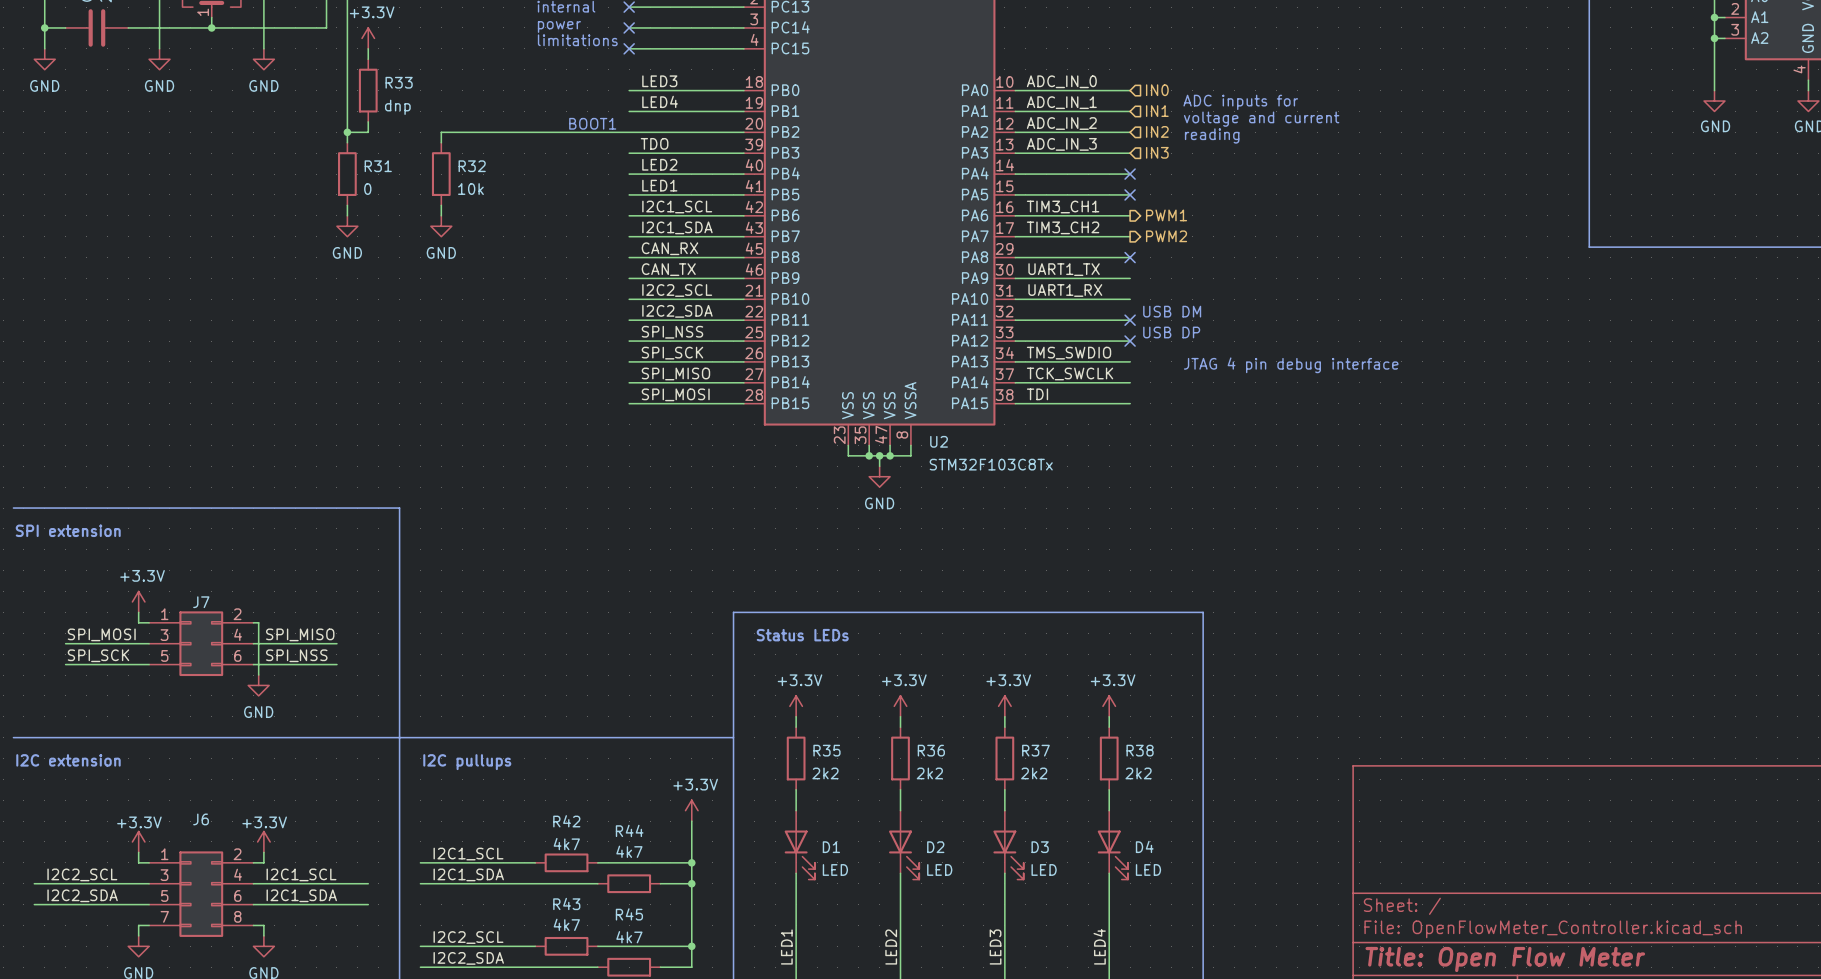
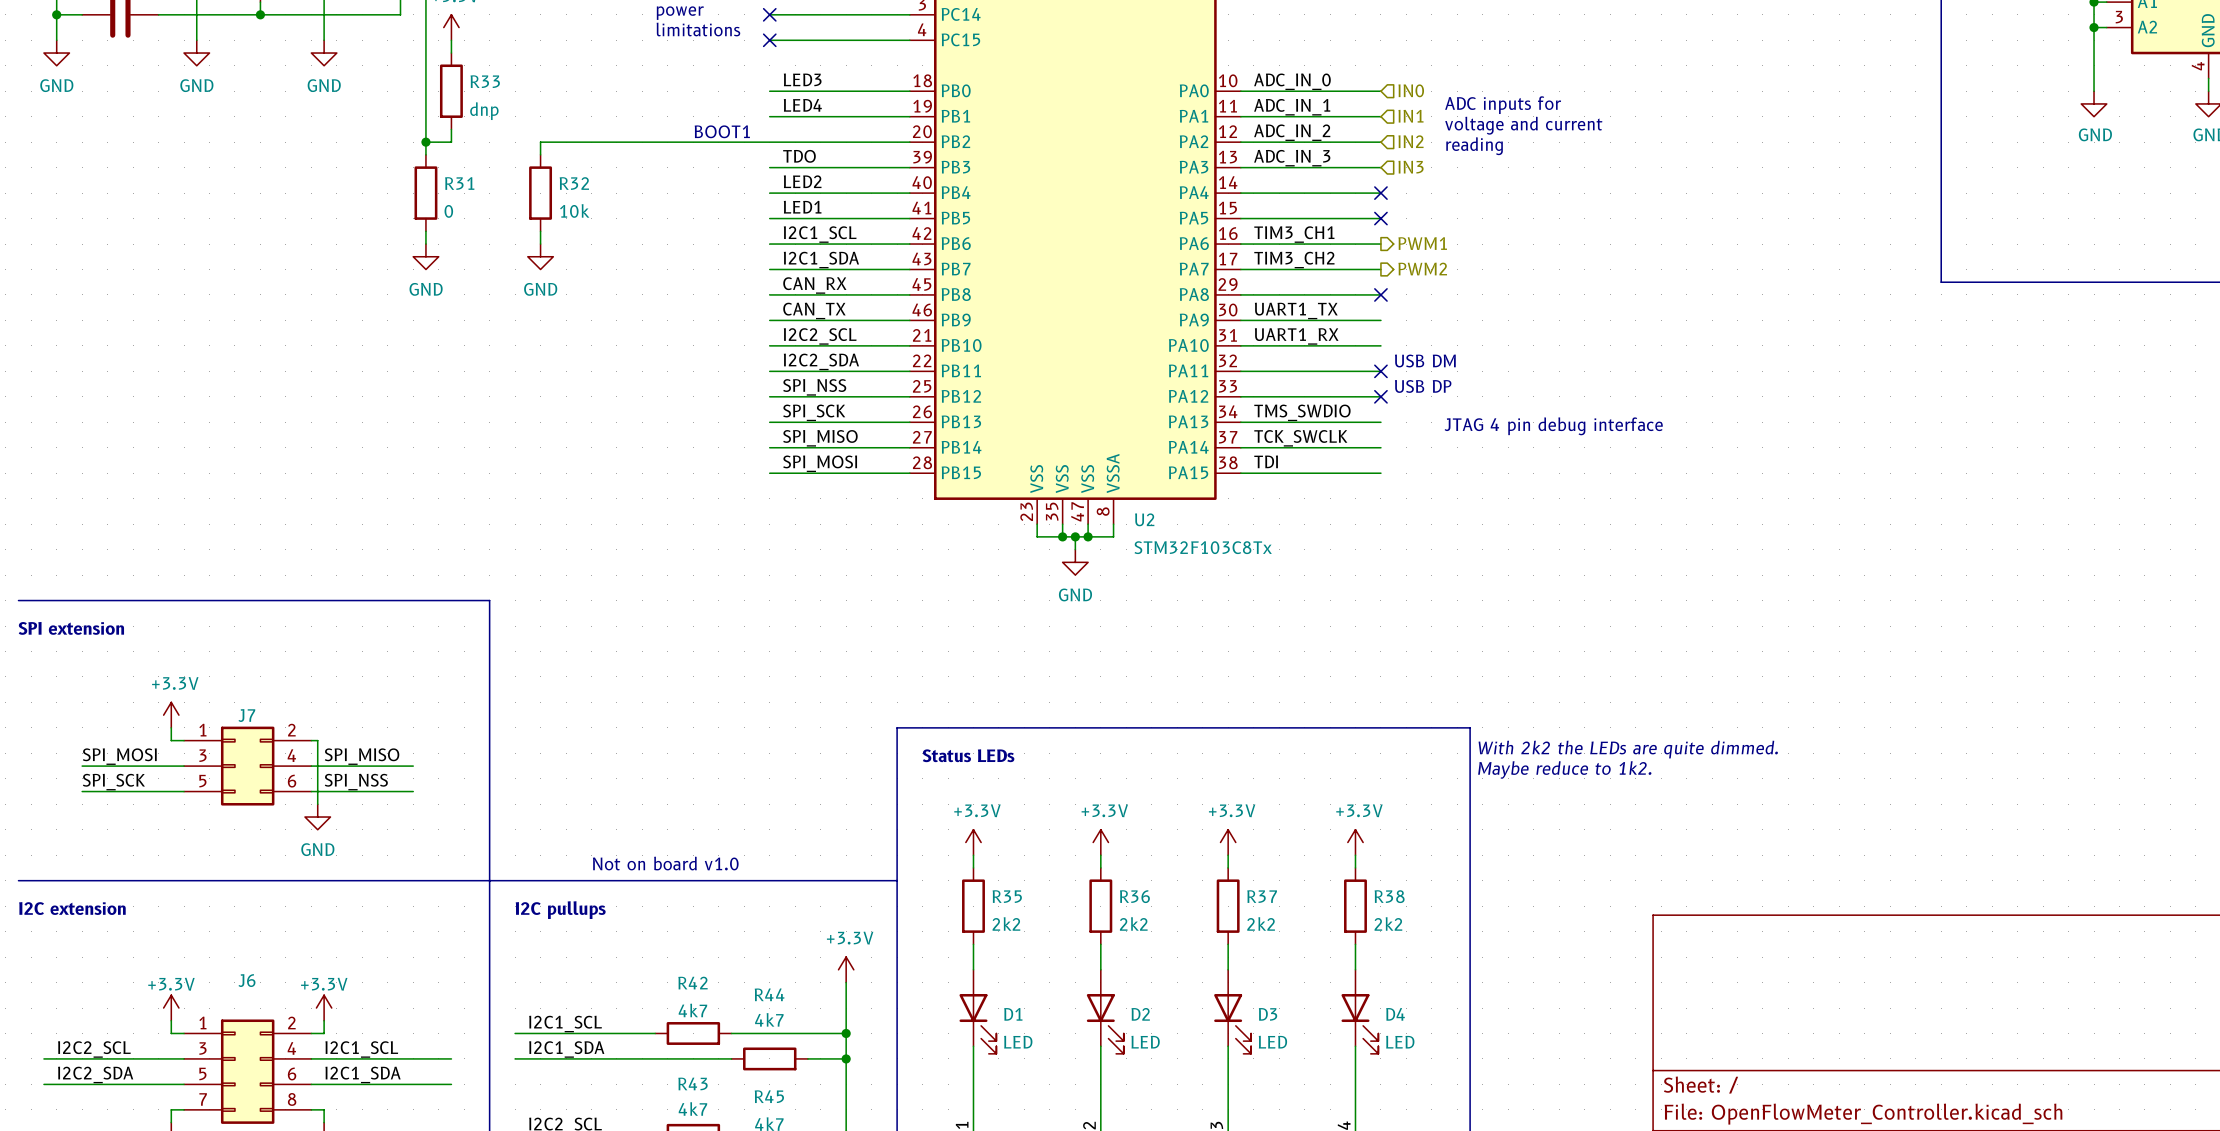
text: none -> With 2k2 the LEDs are quite dimmed. (1628, 749)
text: none -> Maybe reduce to 1k2. (1564, 769)
text: none -> Not on board v1.0 (665, 863)

